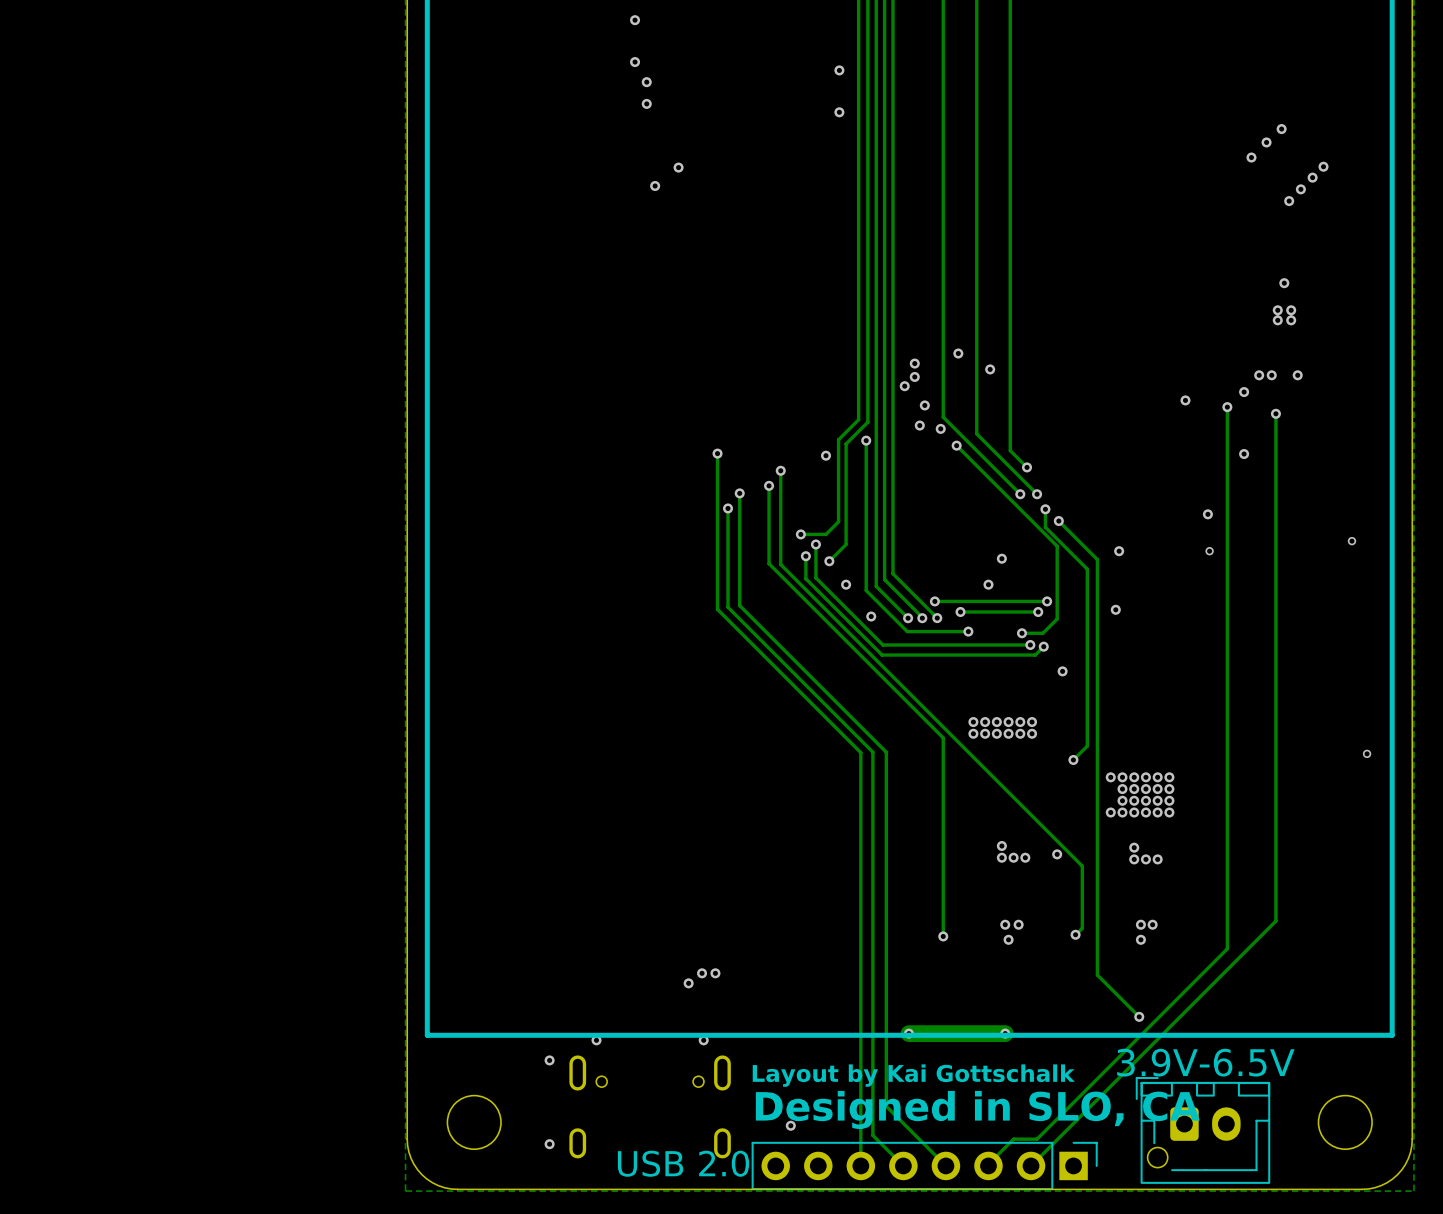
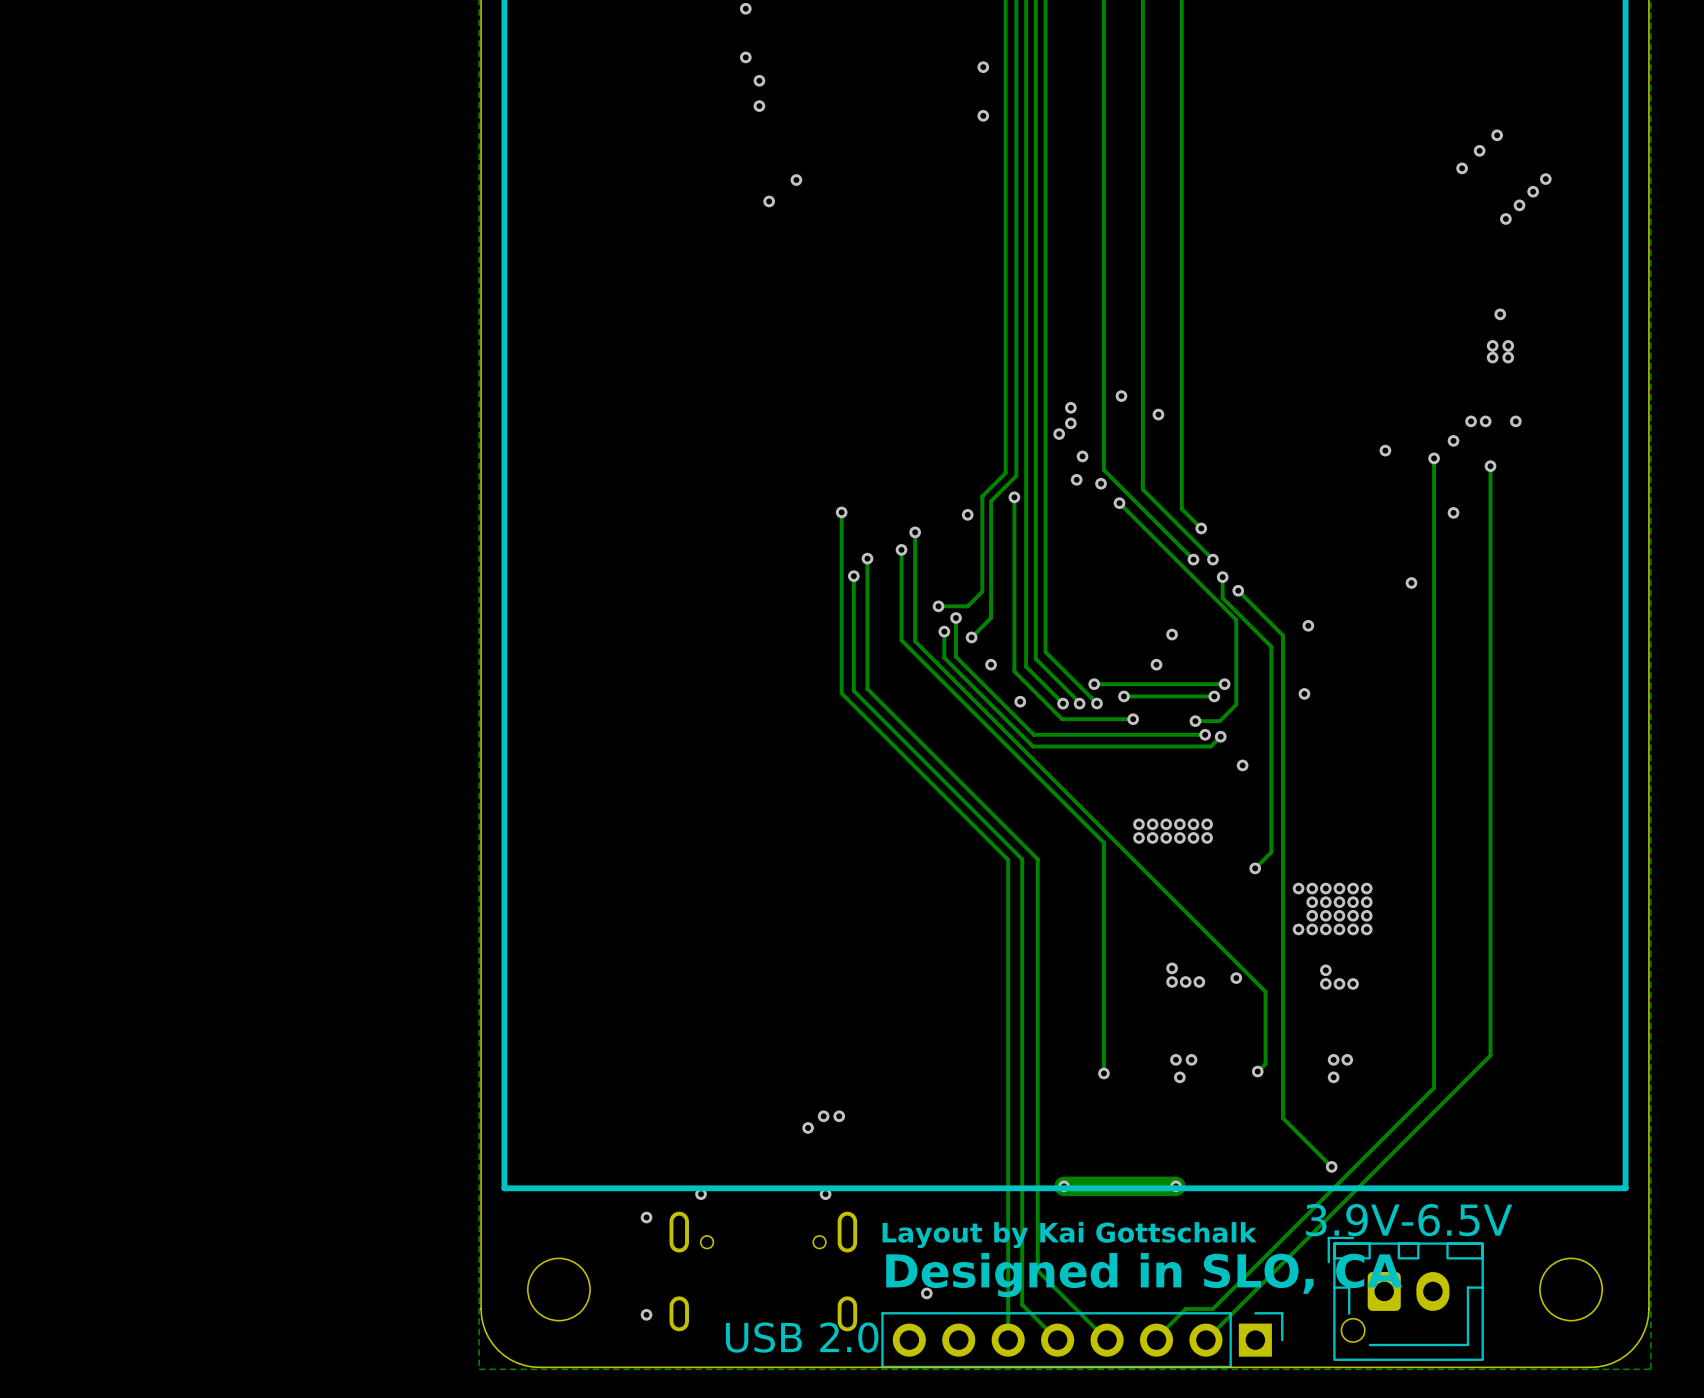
via: (1351, 541) -> none
via: (1209, 551) -> none
via: (1367, 753) -> none

